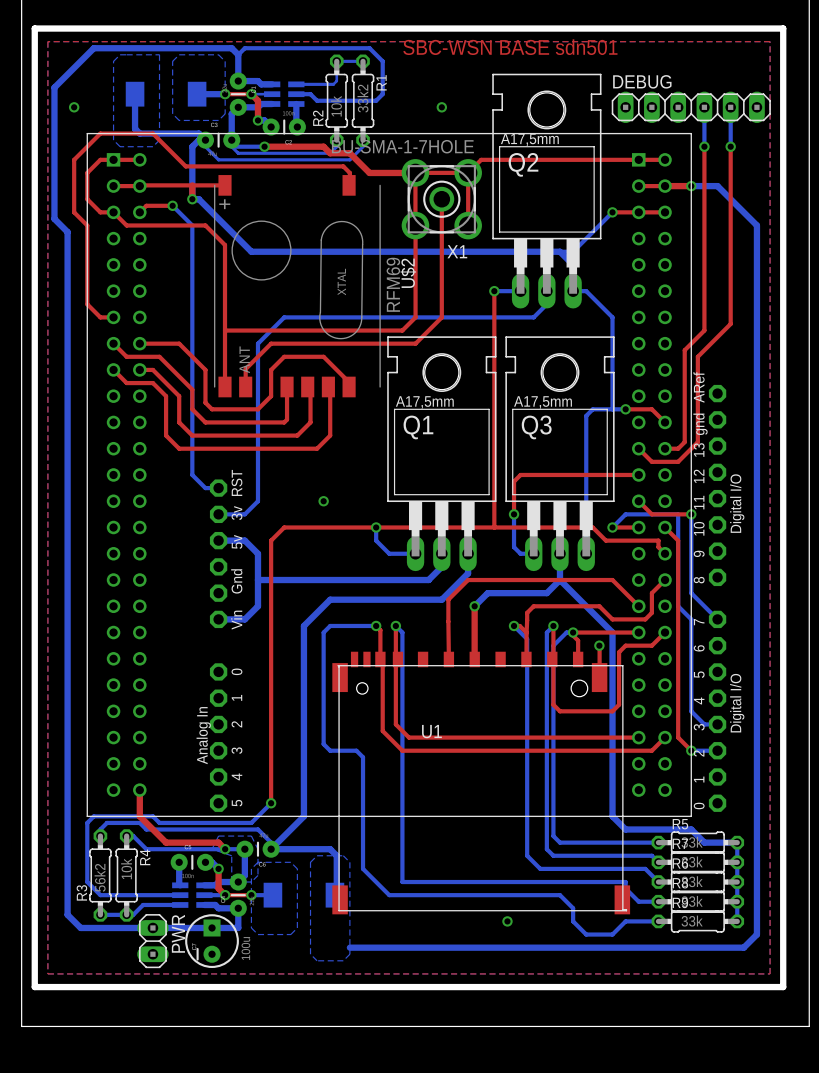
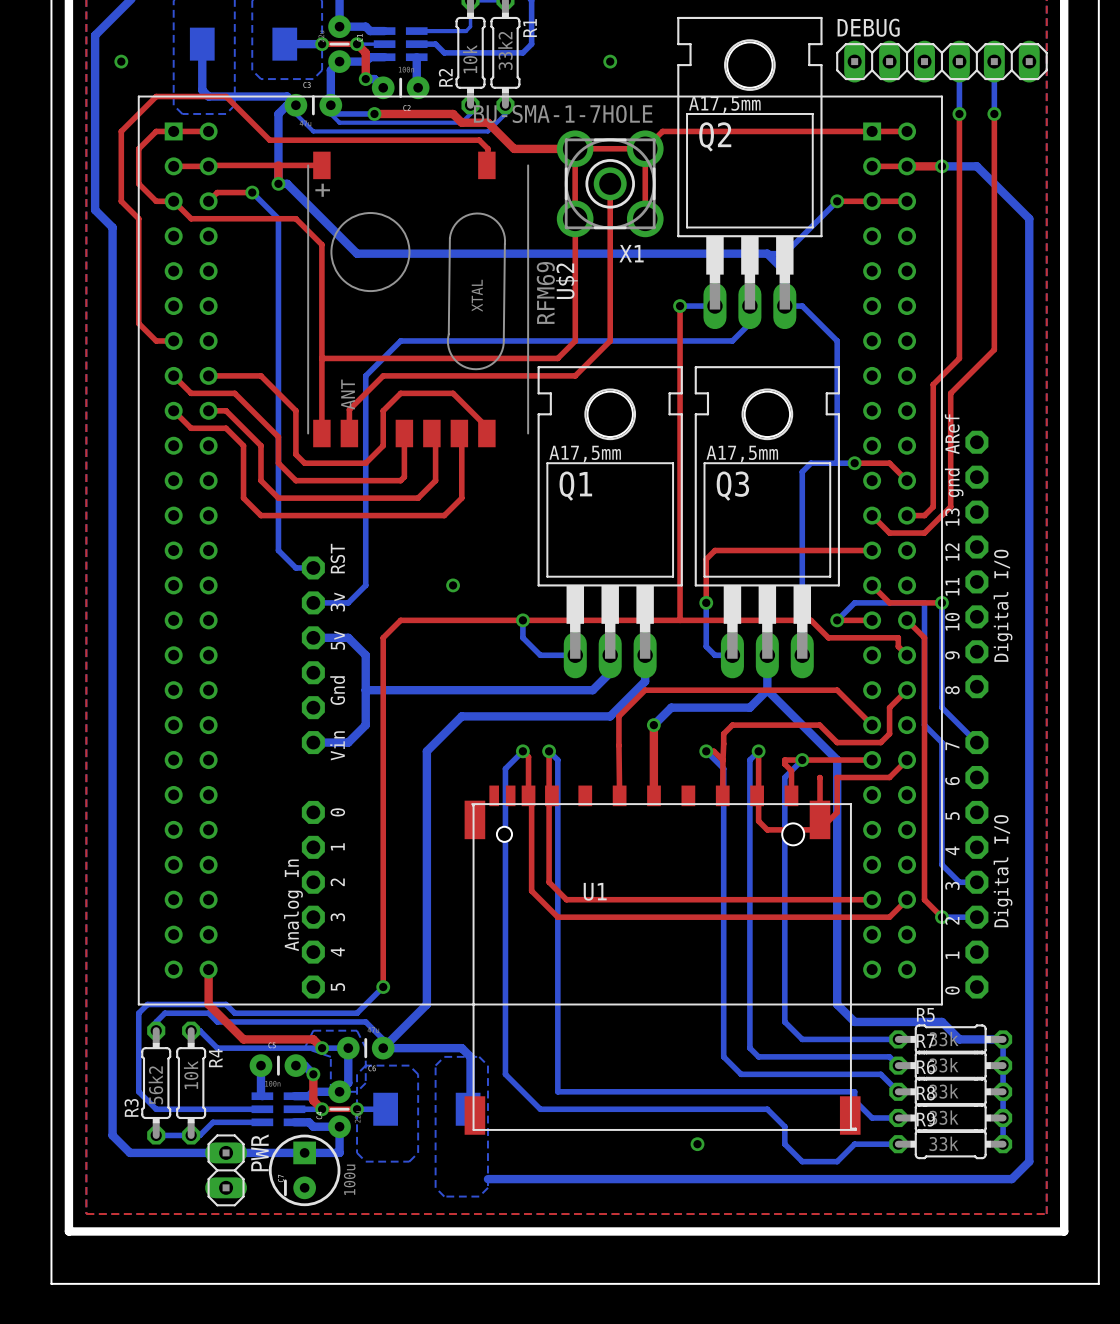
bottom track: (376, 625) (330, 625) (323, 632) (323, 744) (330, 750) (356, 750) (363, 757) -> (522, 751) (505, 768) (505, 925)
bottom track: (573, 632) (566, 632) (553, 645) (553, 836) (559, 842) (586, 842) -> (802, 760) (784, 777) (784, 1021) (802, 1039)
via: (573, 632) -> none
via: none -> (802, 760)
via: (599, 645) -> none
top track: (625, 645) (619, 652) (619, 704) (612, 711) (559, 711) (553, 704) (553, 678) -> (854, 777) (837, 777) (837, 812) (819, 829) (767, 829) (758, 821)

